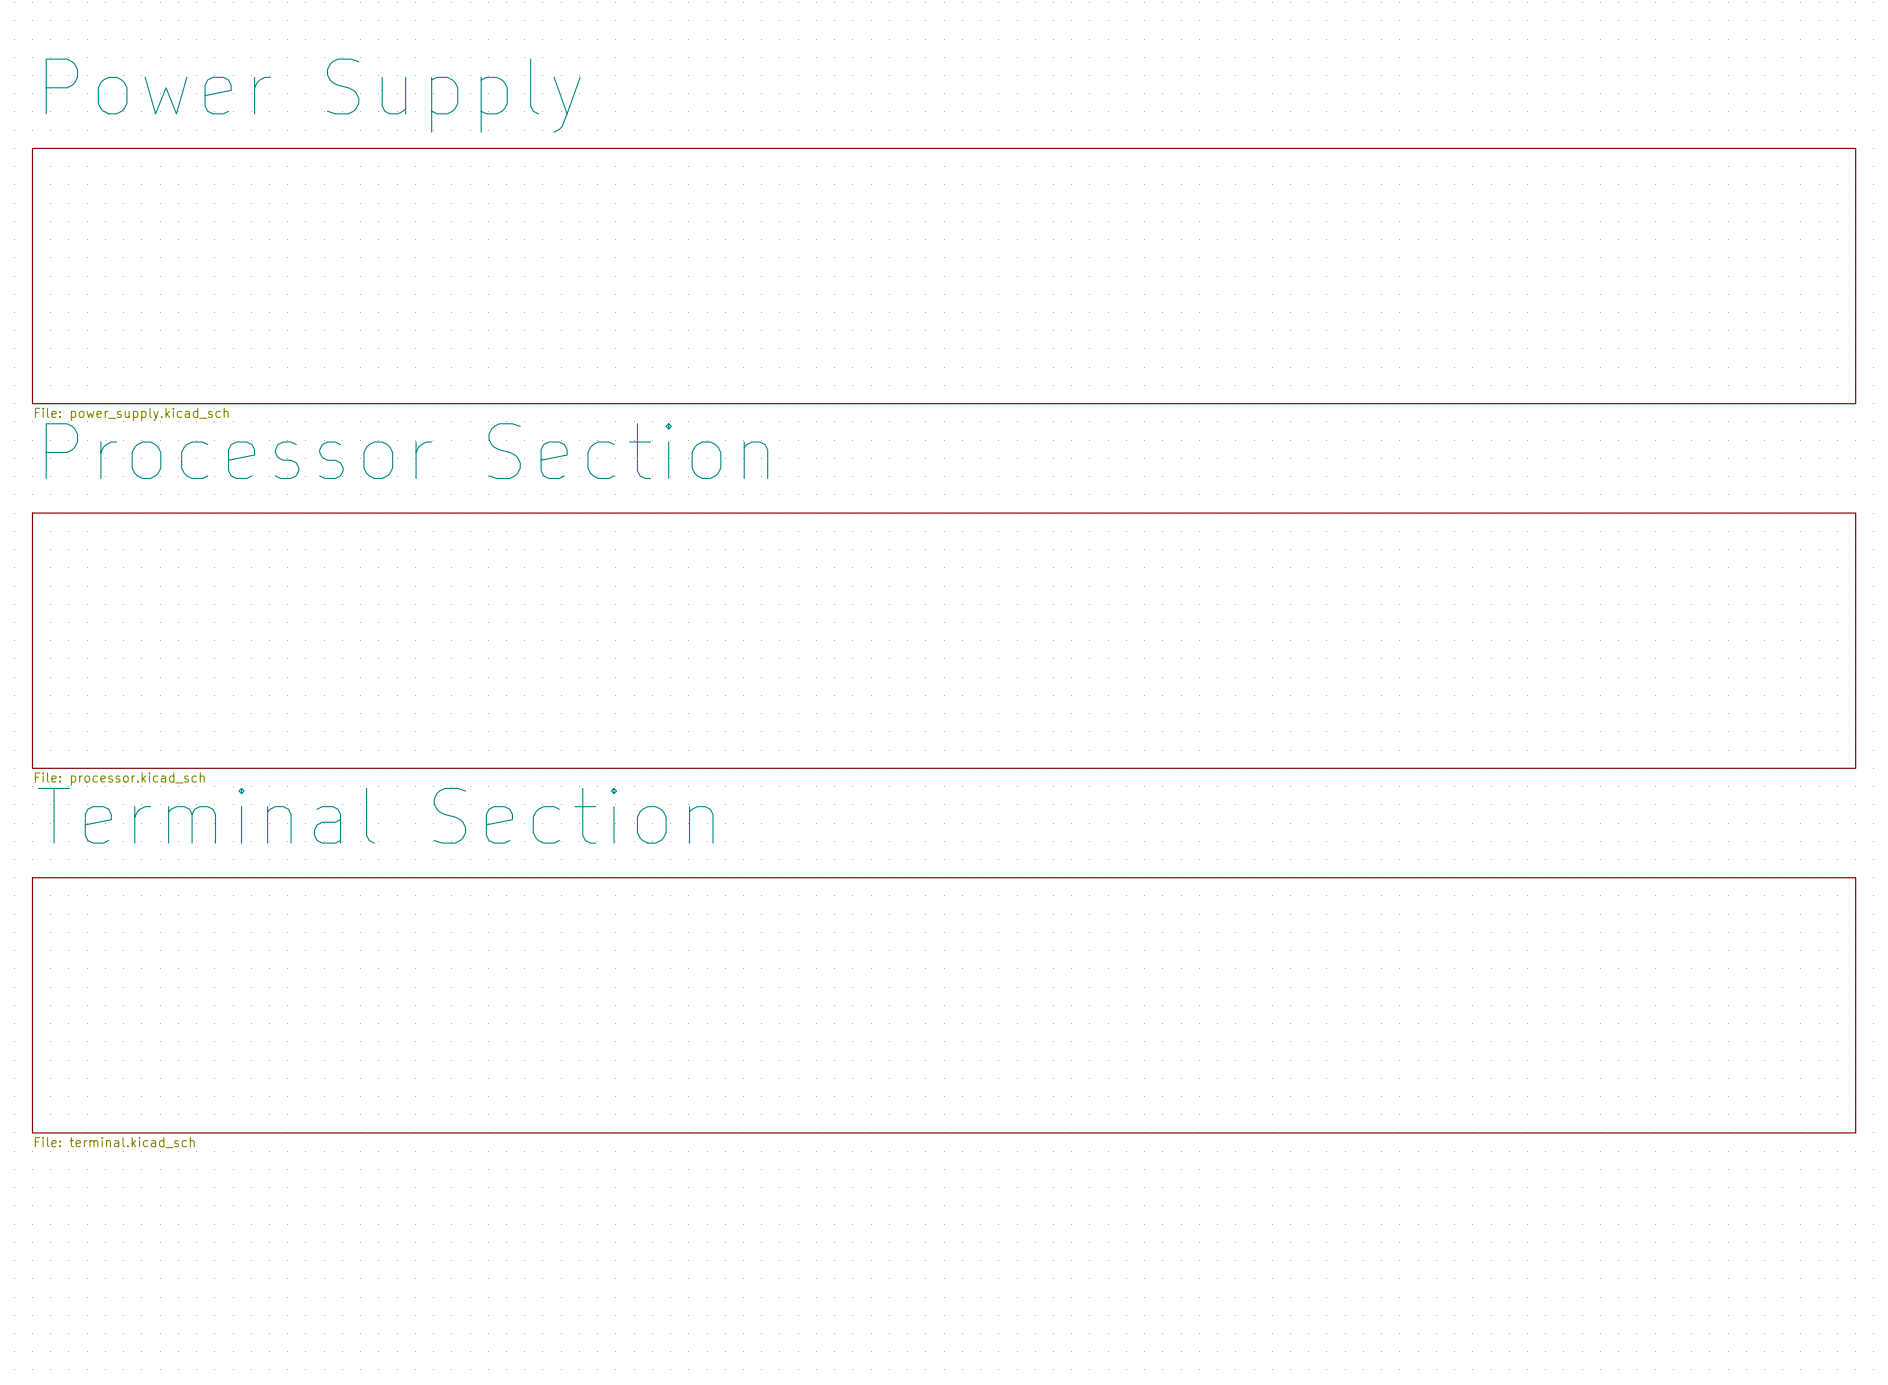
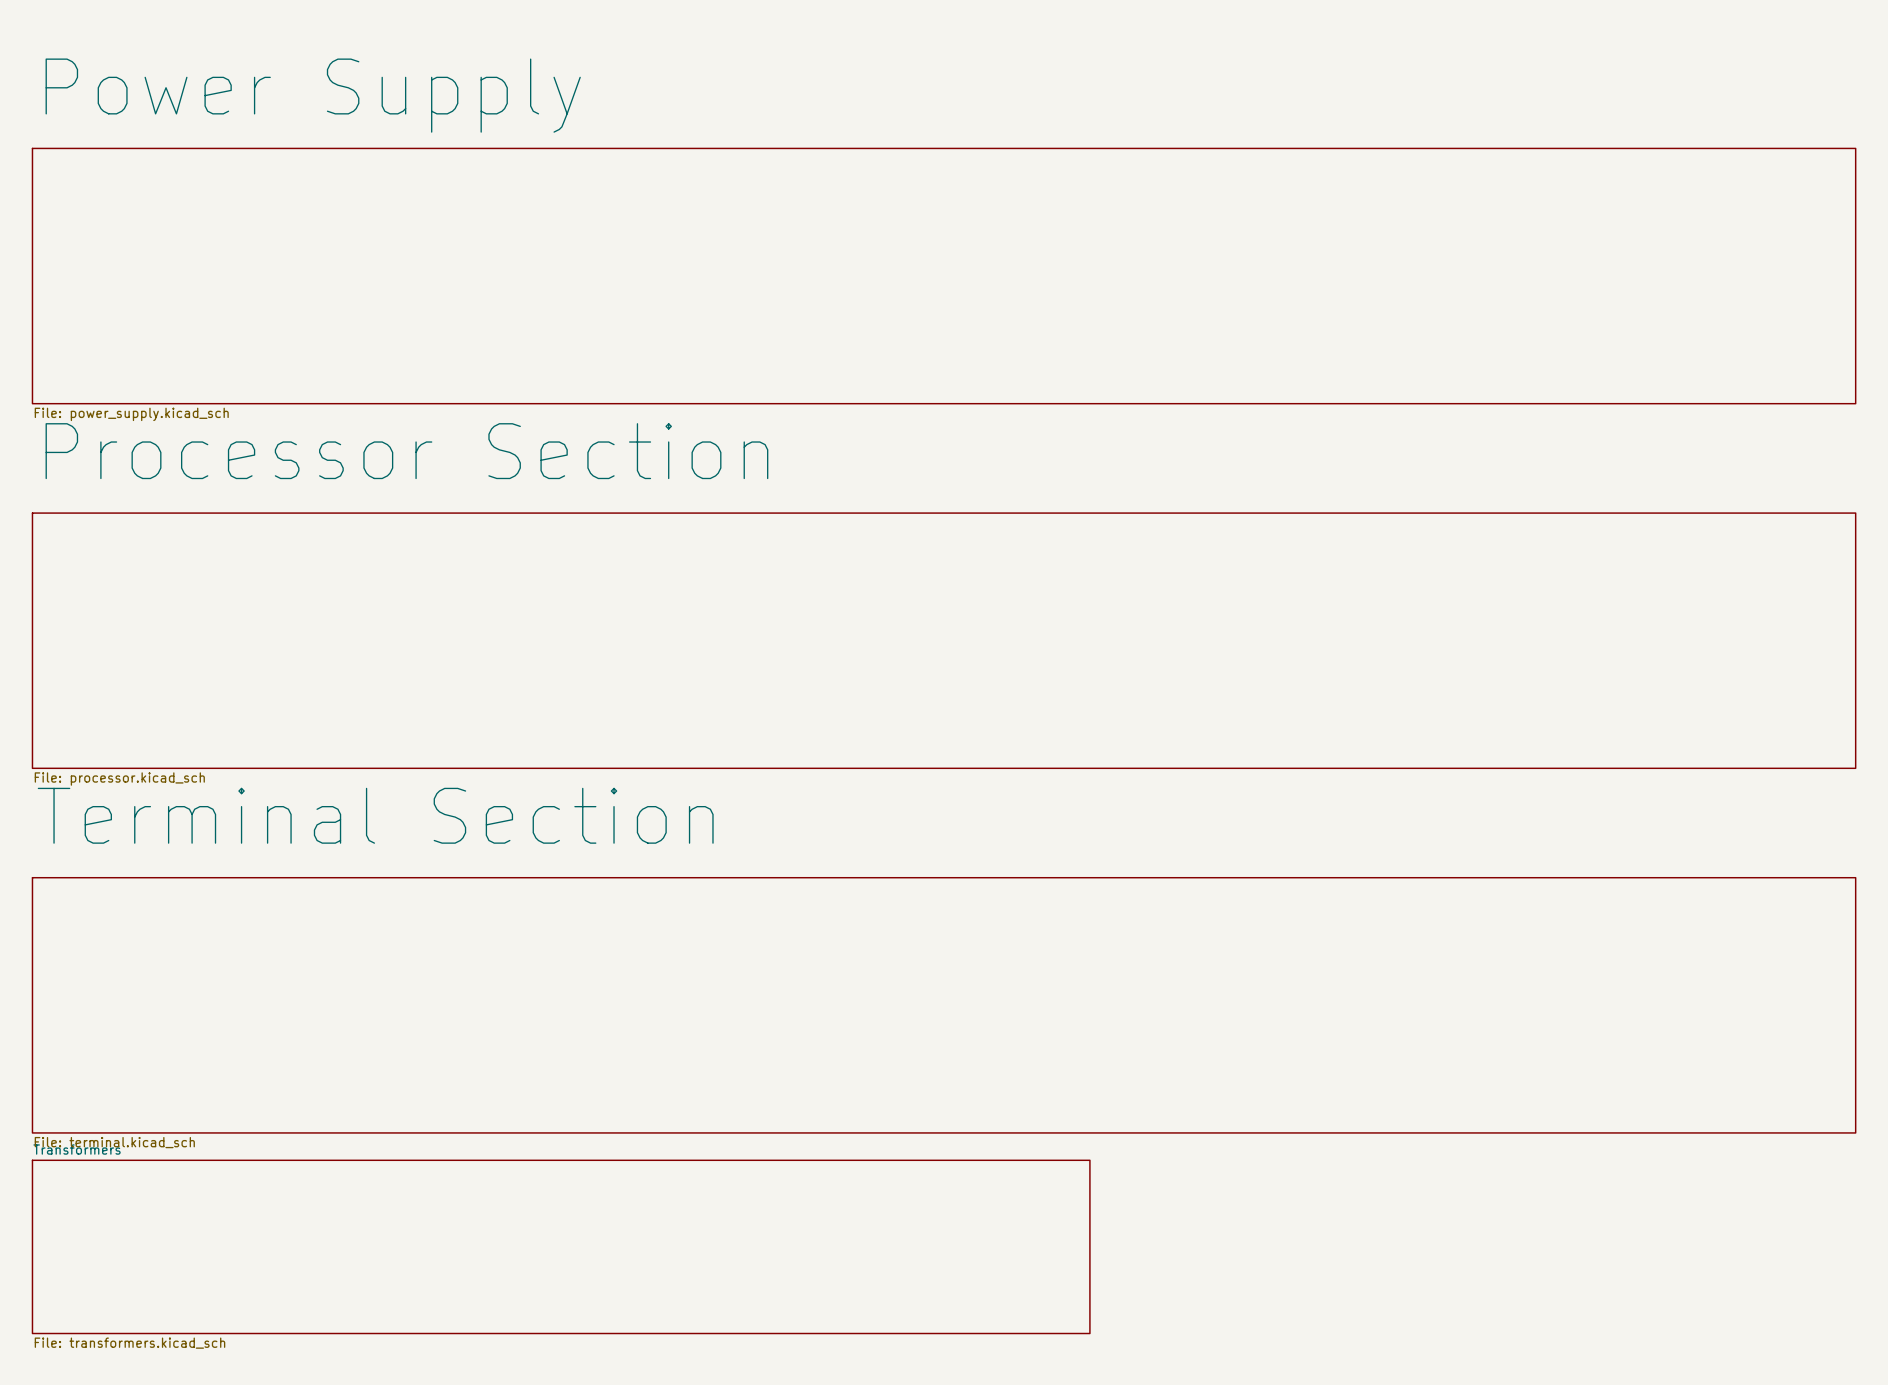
sheet Transformers: none -> File: transformers.kicad_sch (561, 1246)

